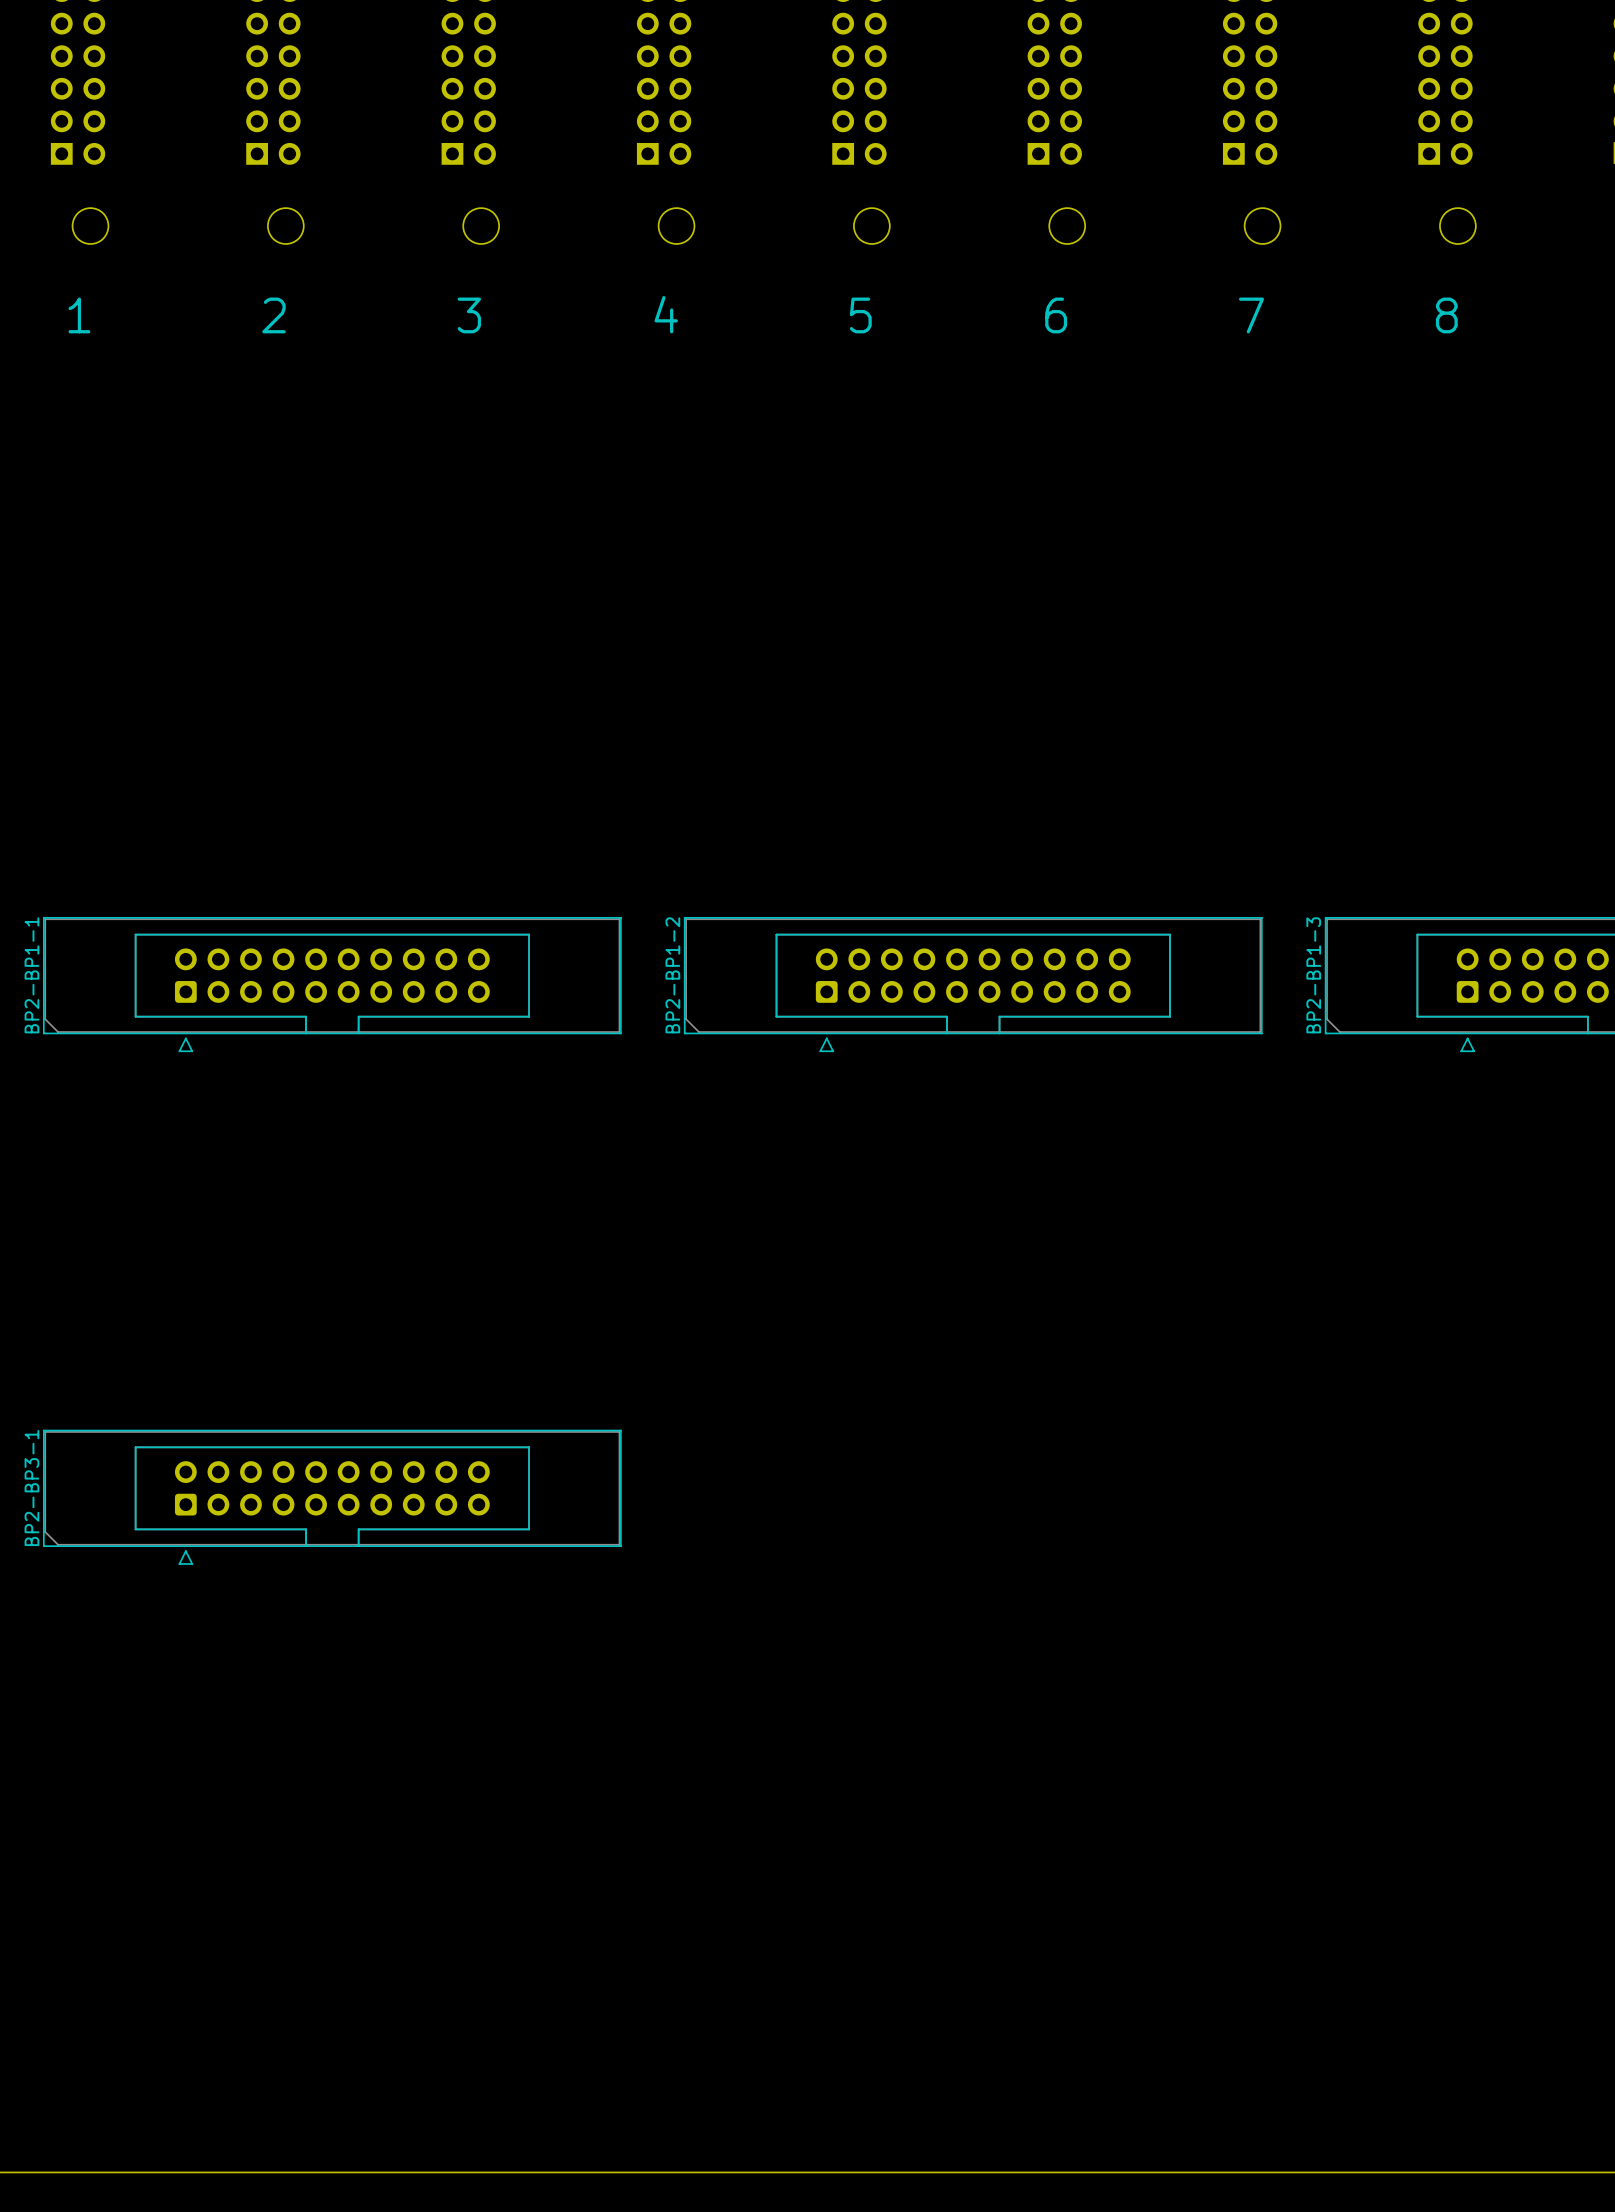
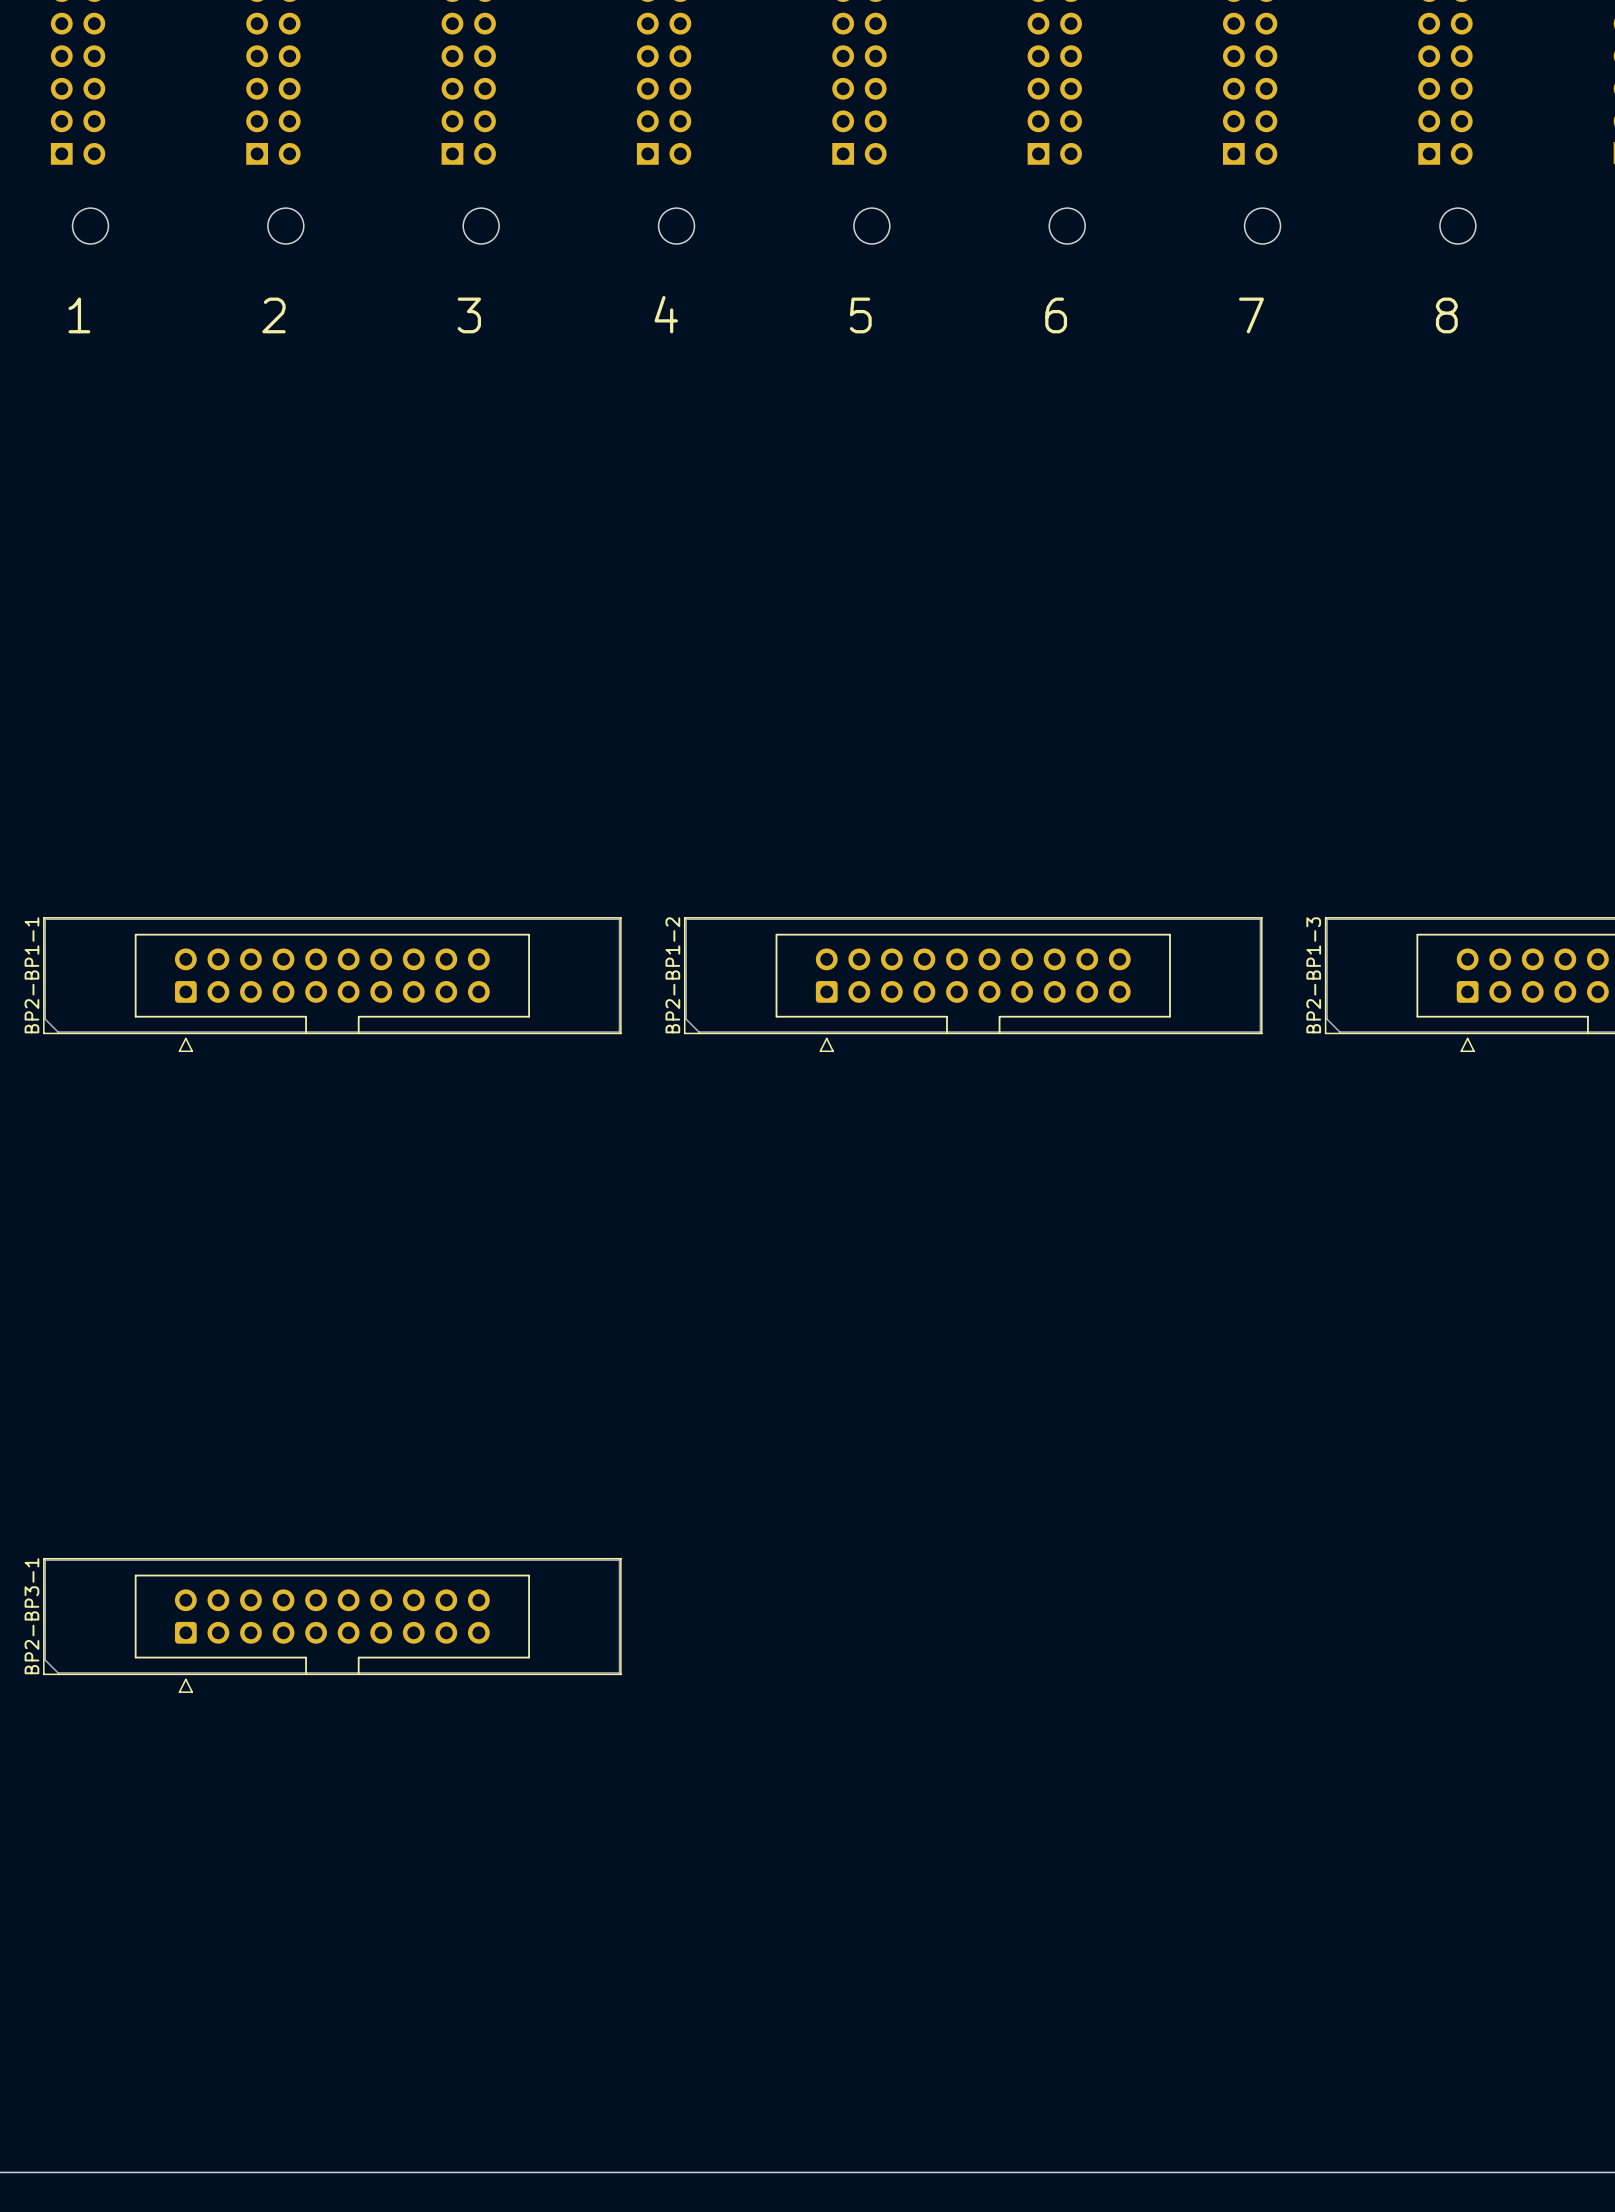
BP2-BP3-1 position: (332, 1497) -> (332, 1625)

